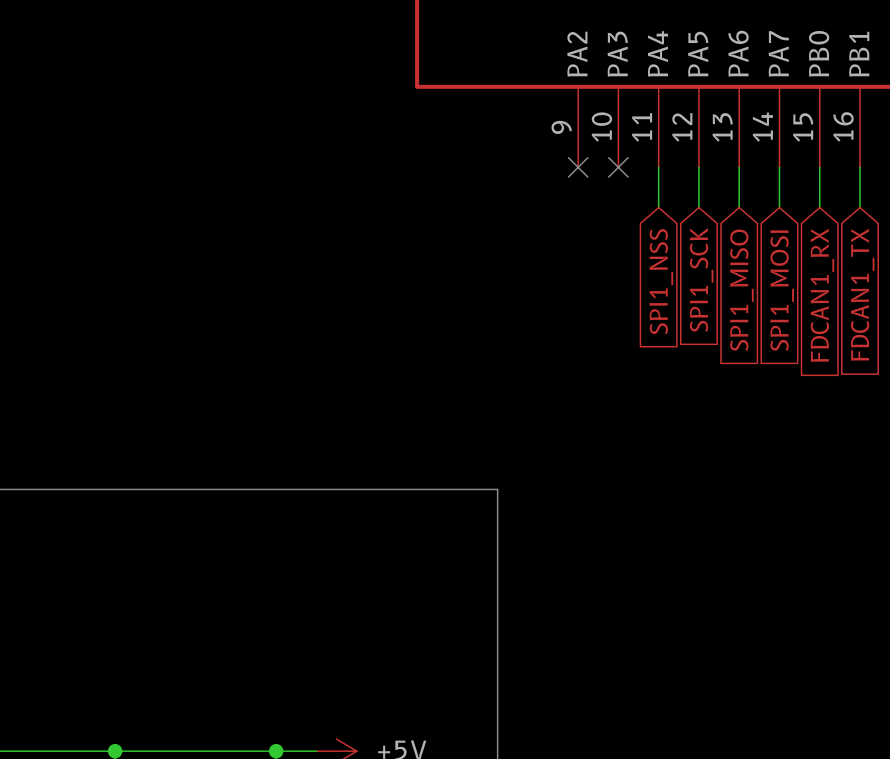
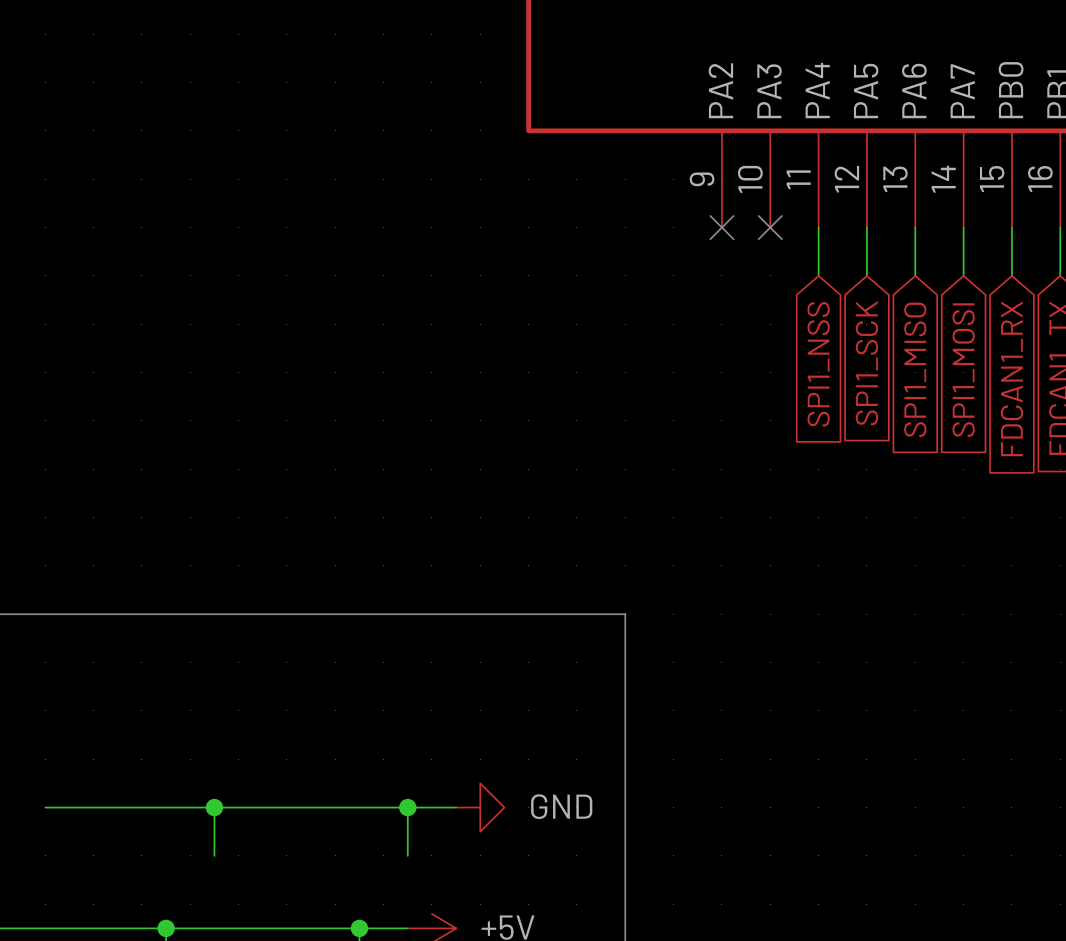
wire: none -> (45, 807) (456, 807)
wire: none -> (214, 807) (214, 855)
junction: none -> (214, 807)
wire: none -> (407, 807) (407, 855)
junction: none -> (407, 807)
power symbol: none -> GND (480, 807)

